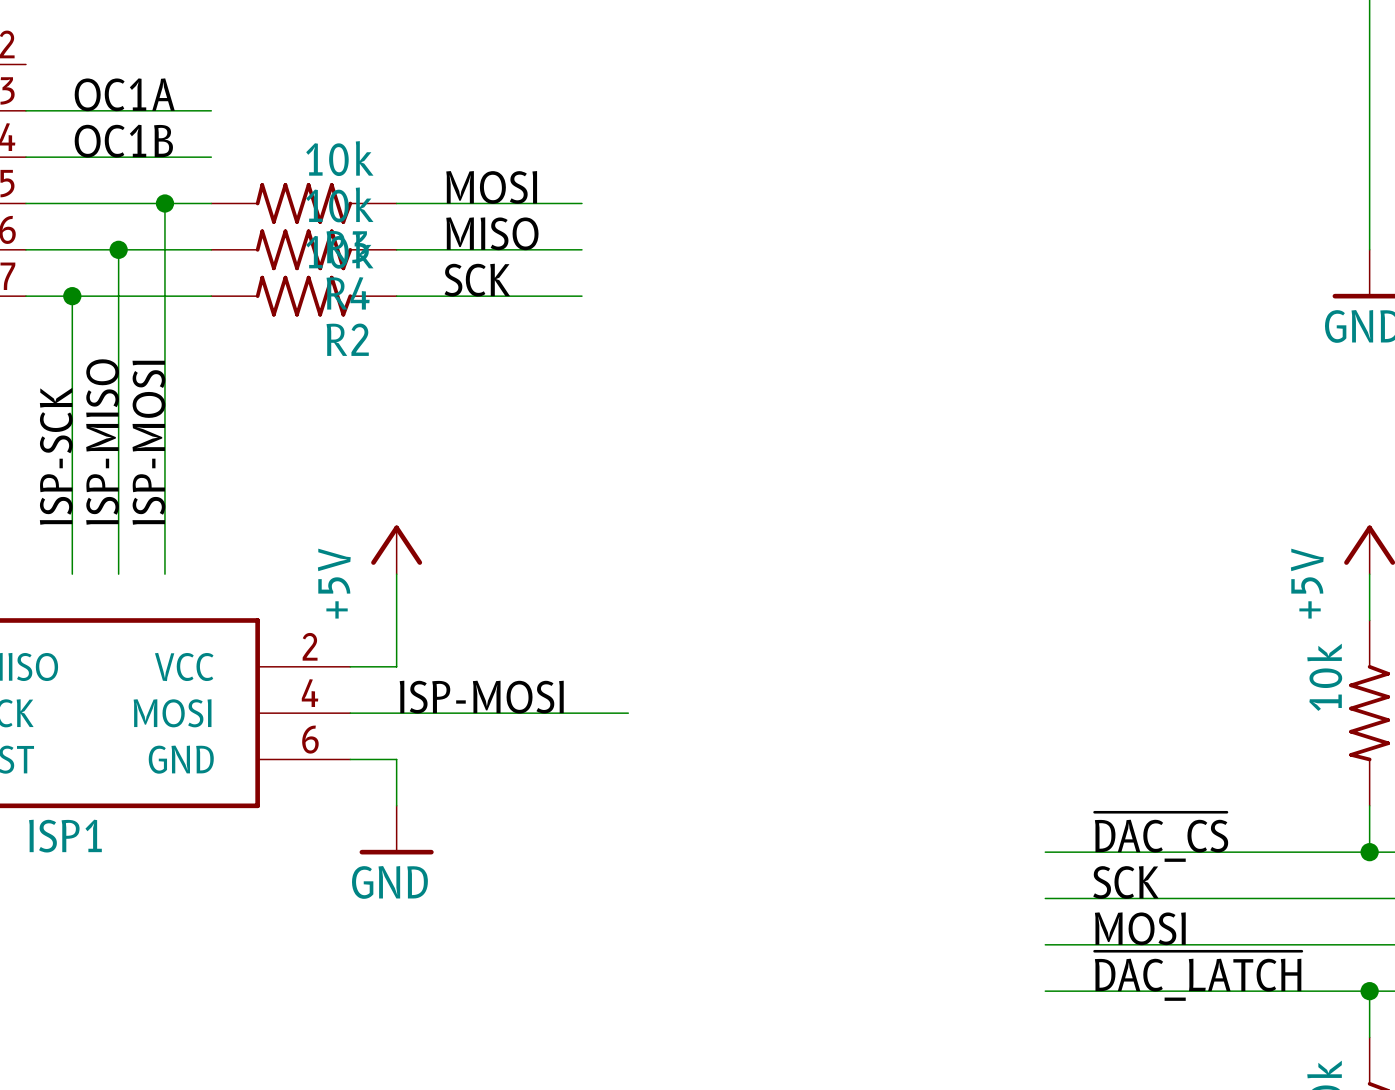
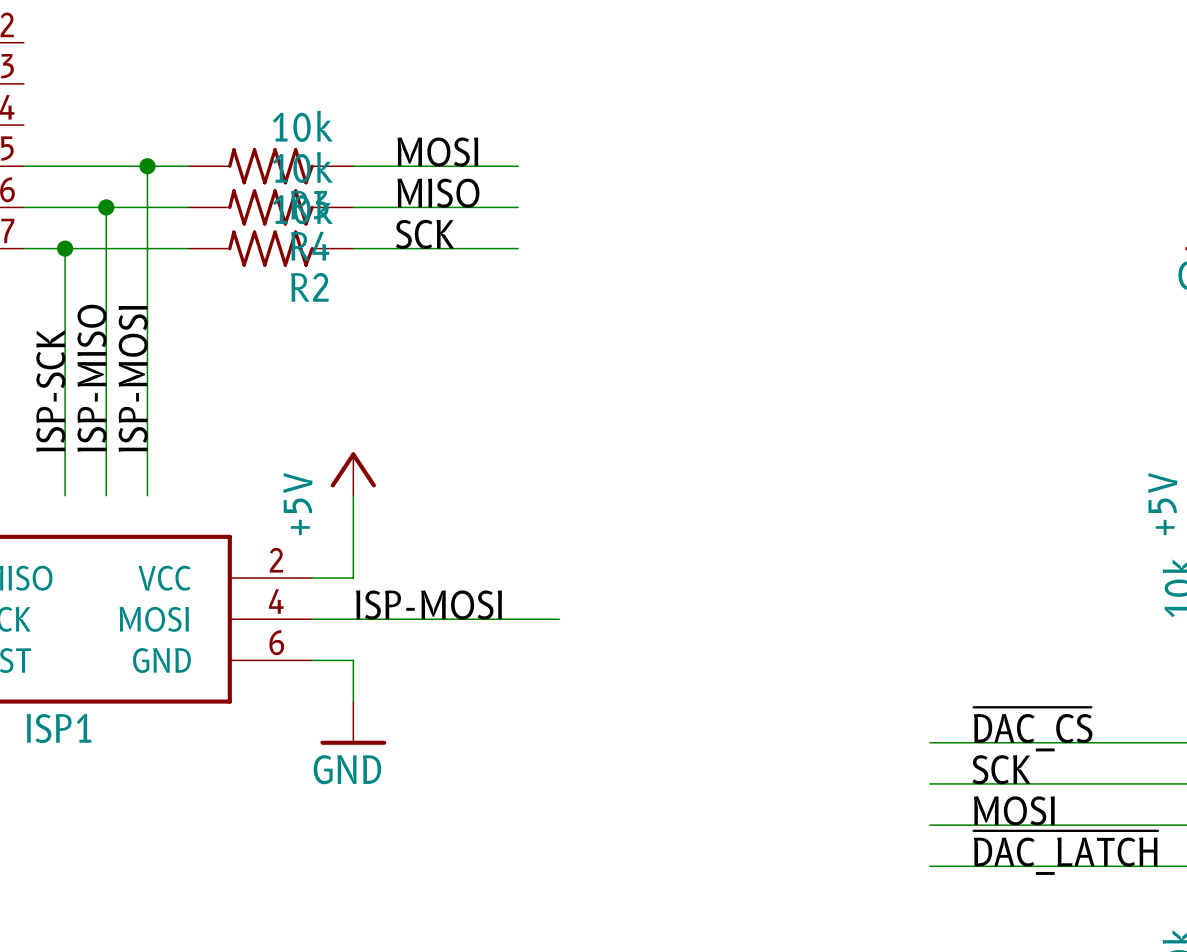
label: OC1A (124, 94) -> none
wire: (25, 110) (211, 110) -> none
label: OC1B (123, 141) -> none
wire: (25, 157) (211, 157) -> none

